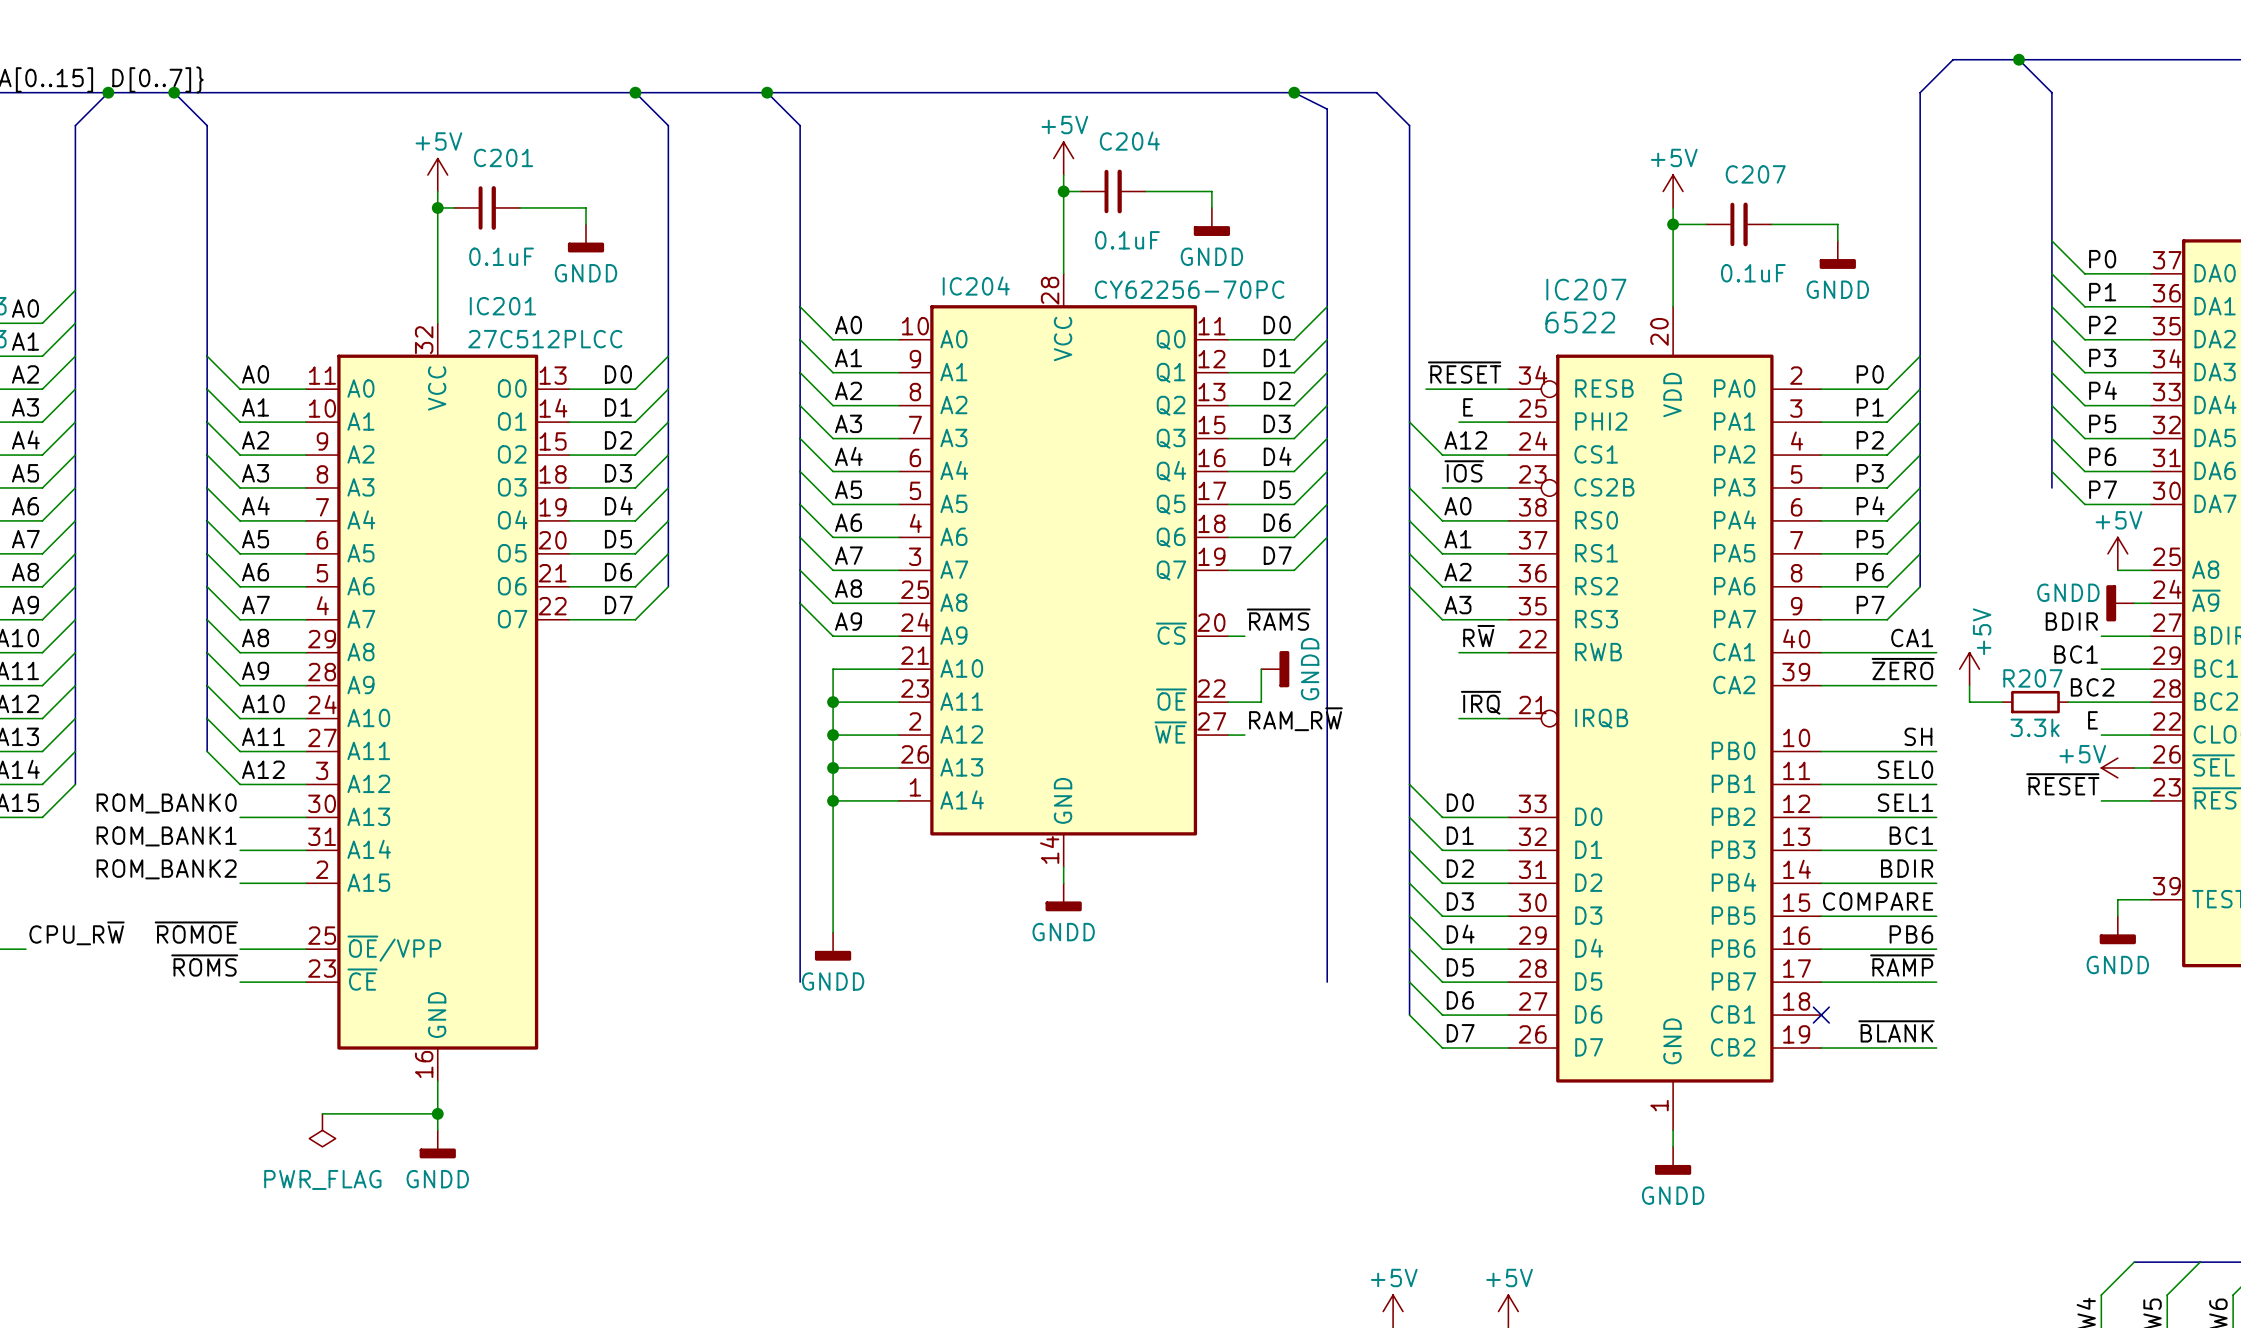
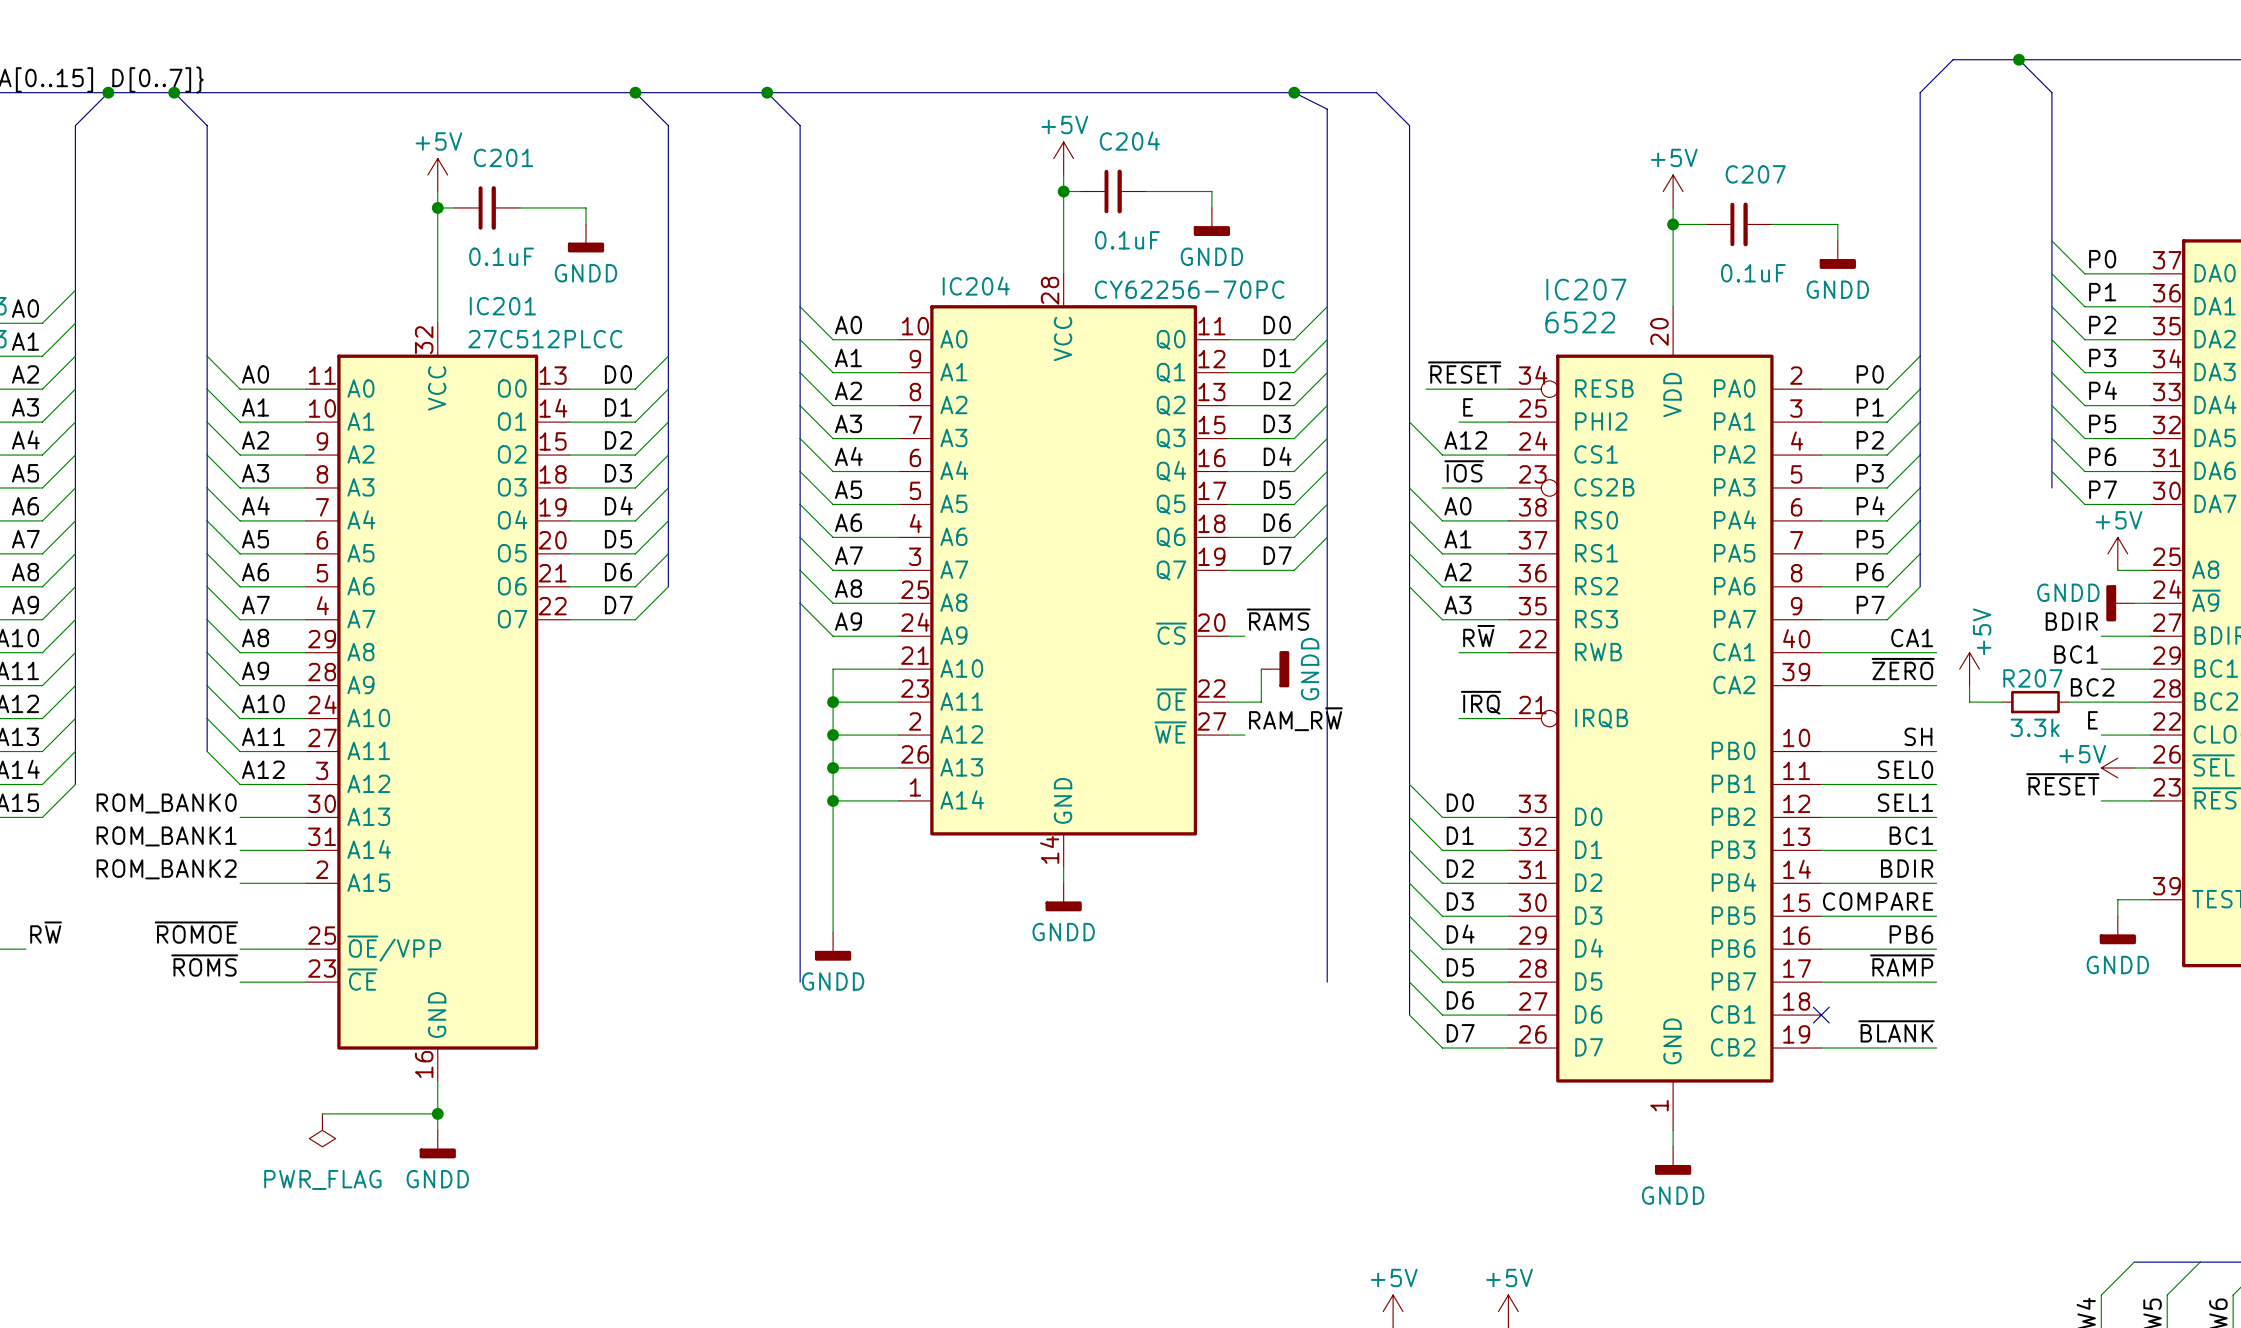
label: CPU_R~{W} (77, 933) -> R~{W} (46, 932)

